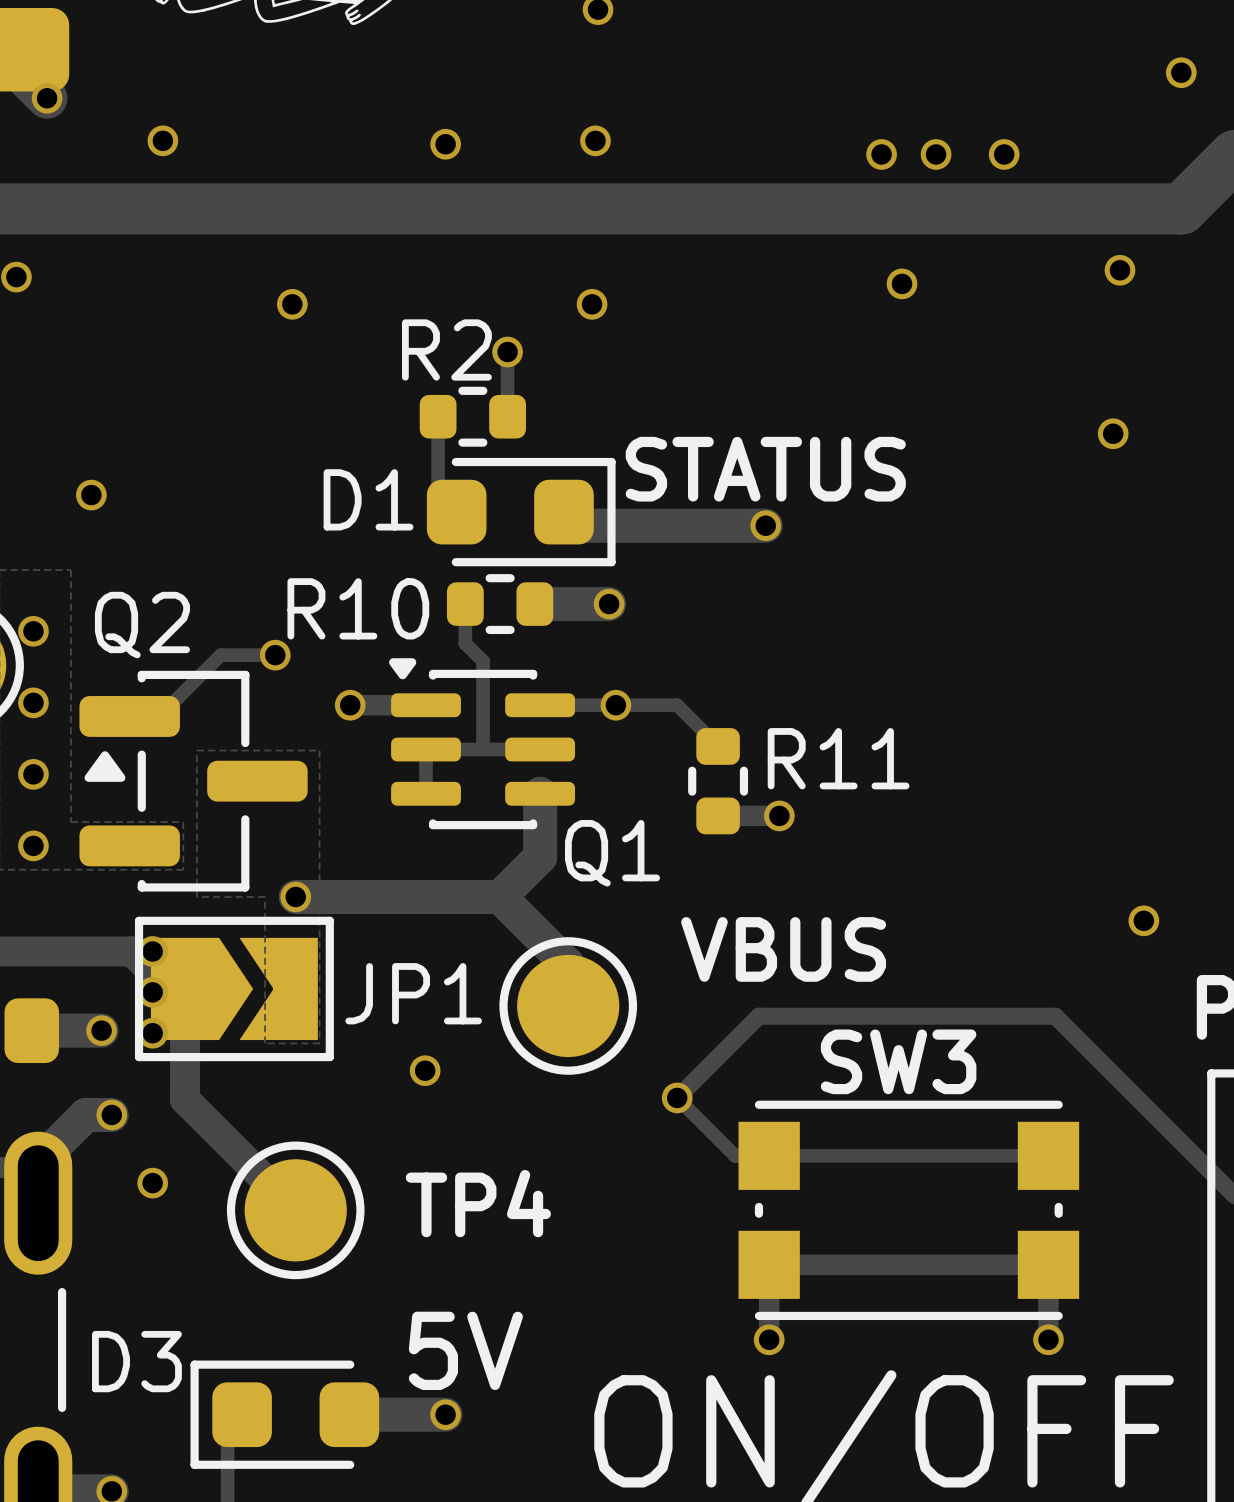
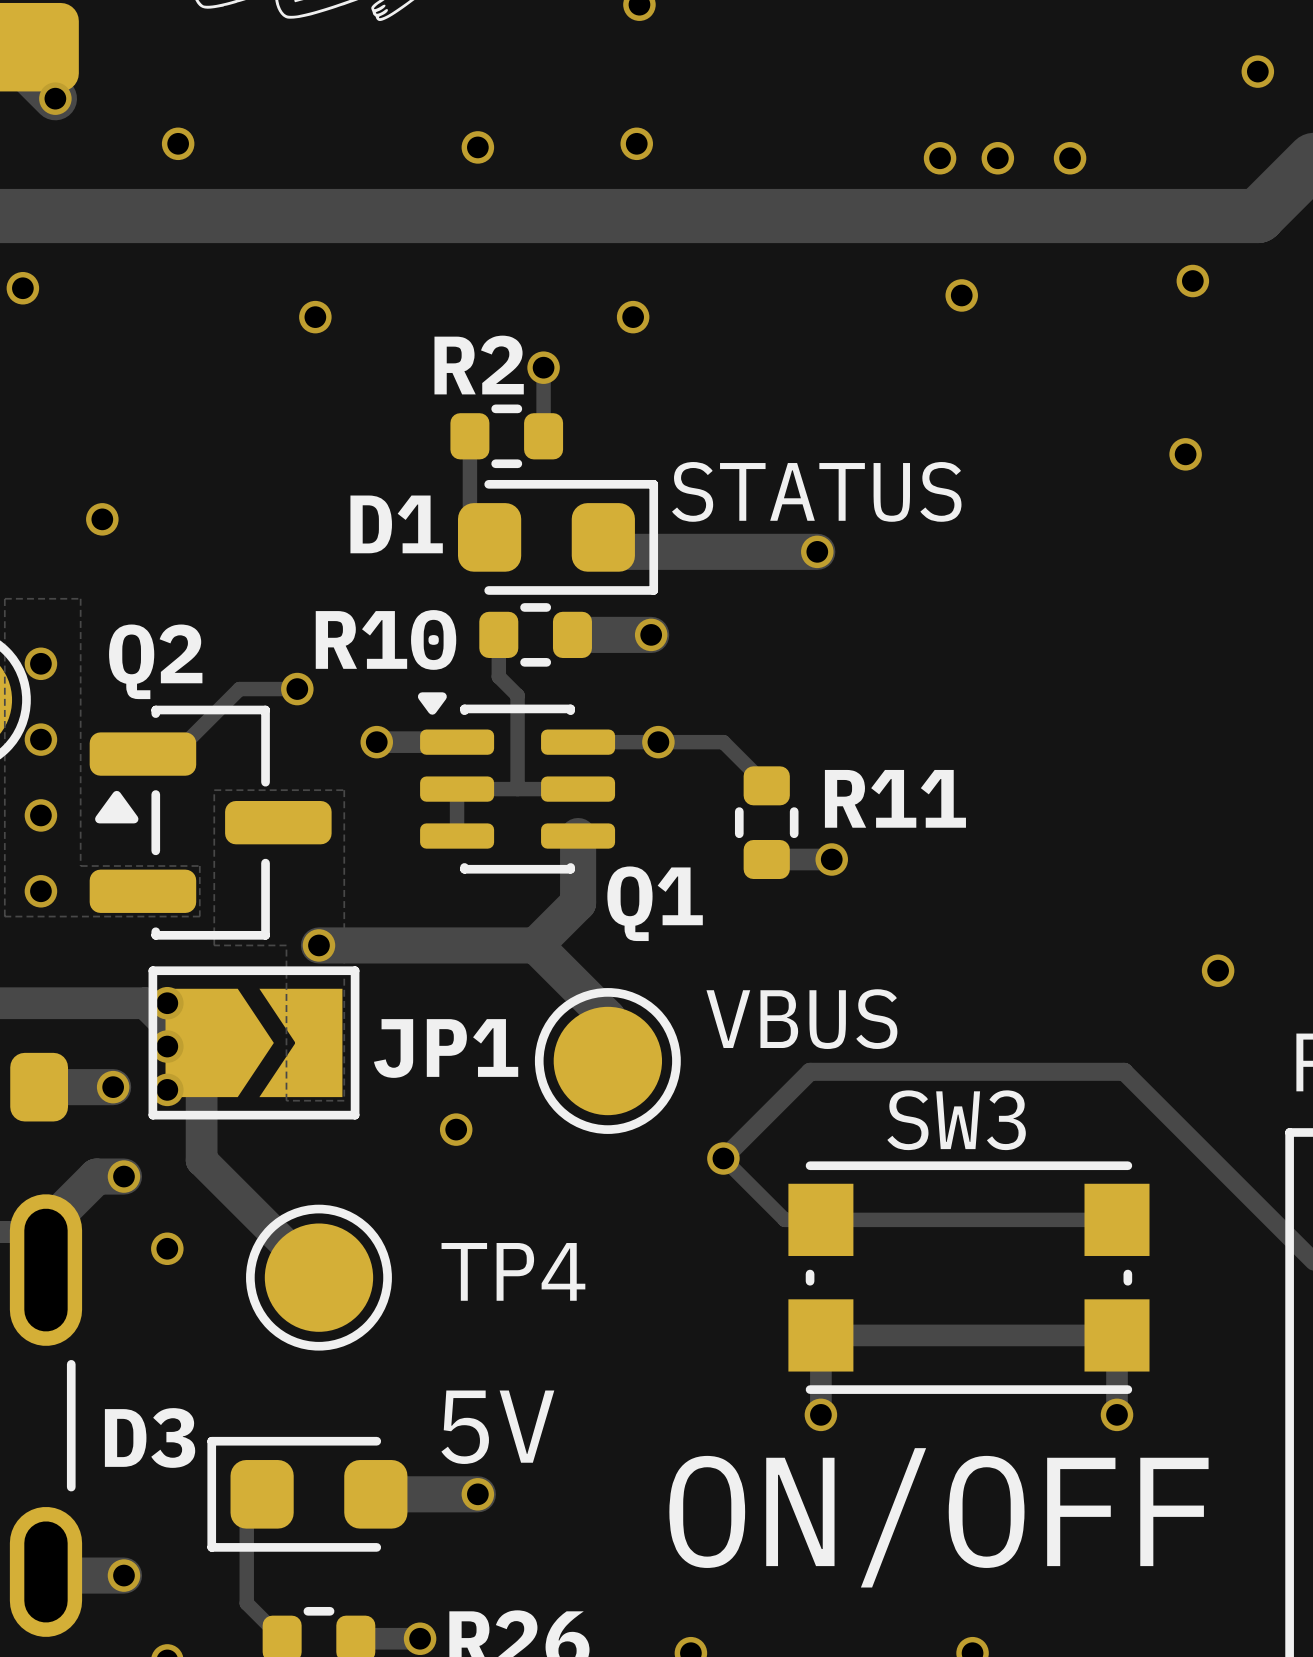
VBUS name position: VBUS (783, 949) -> VBUS (801, 1019)

